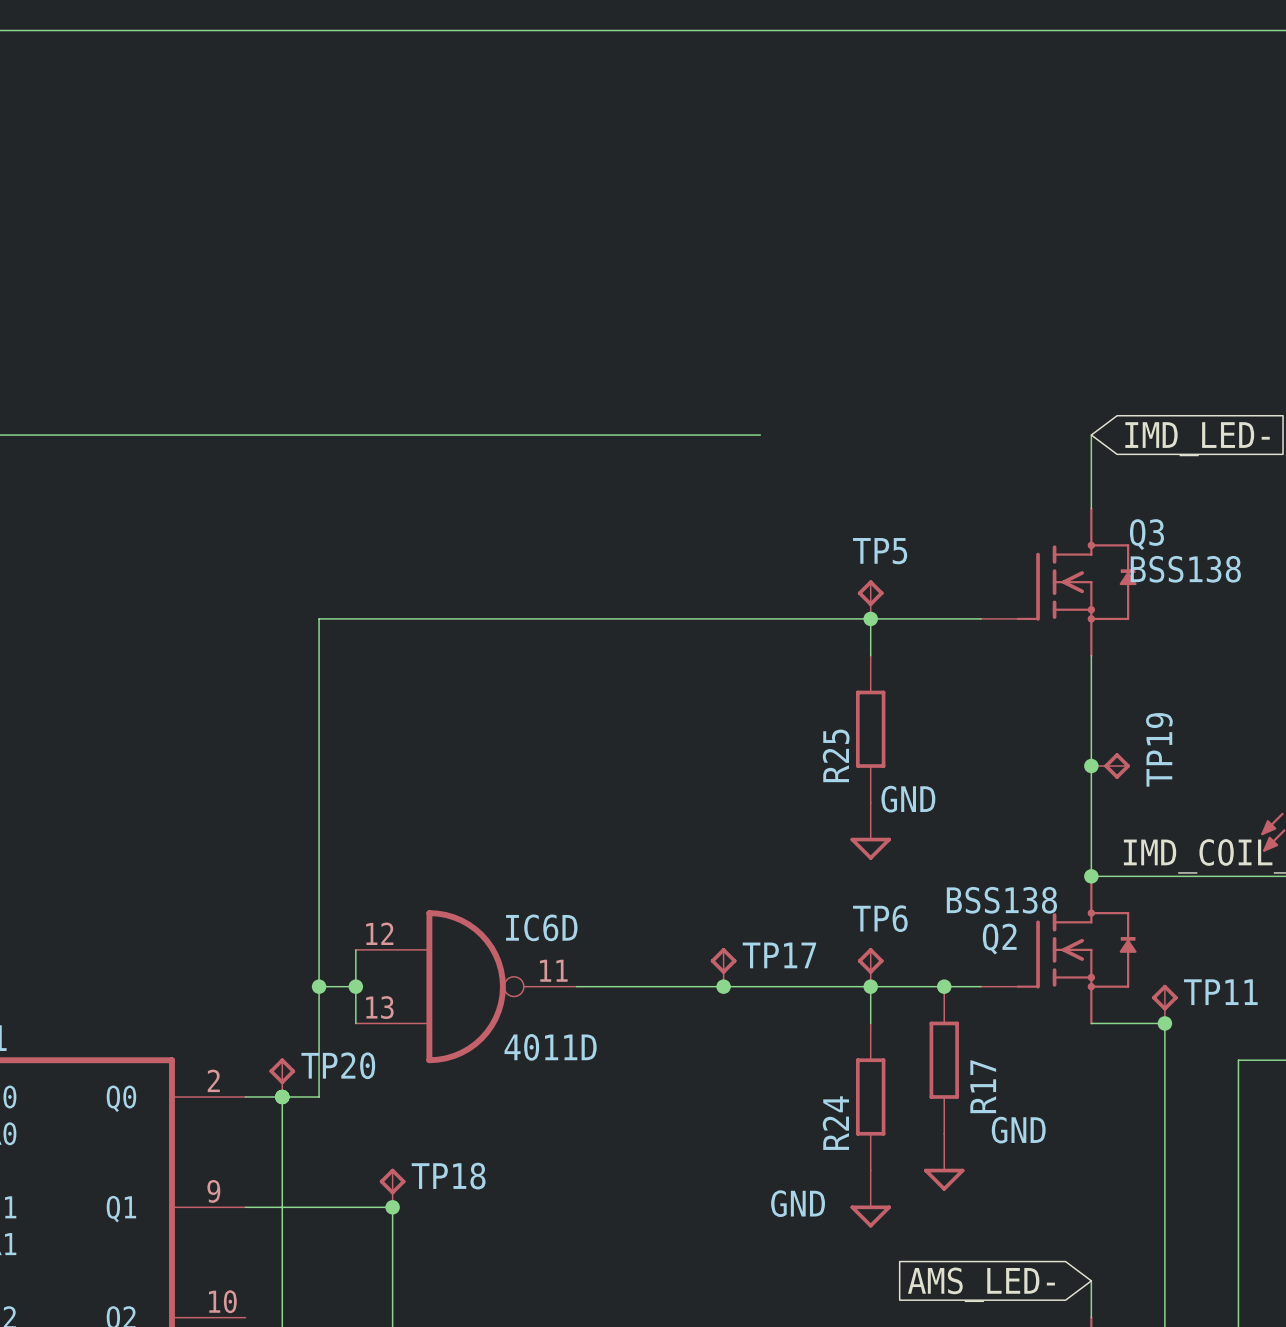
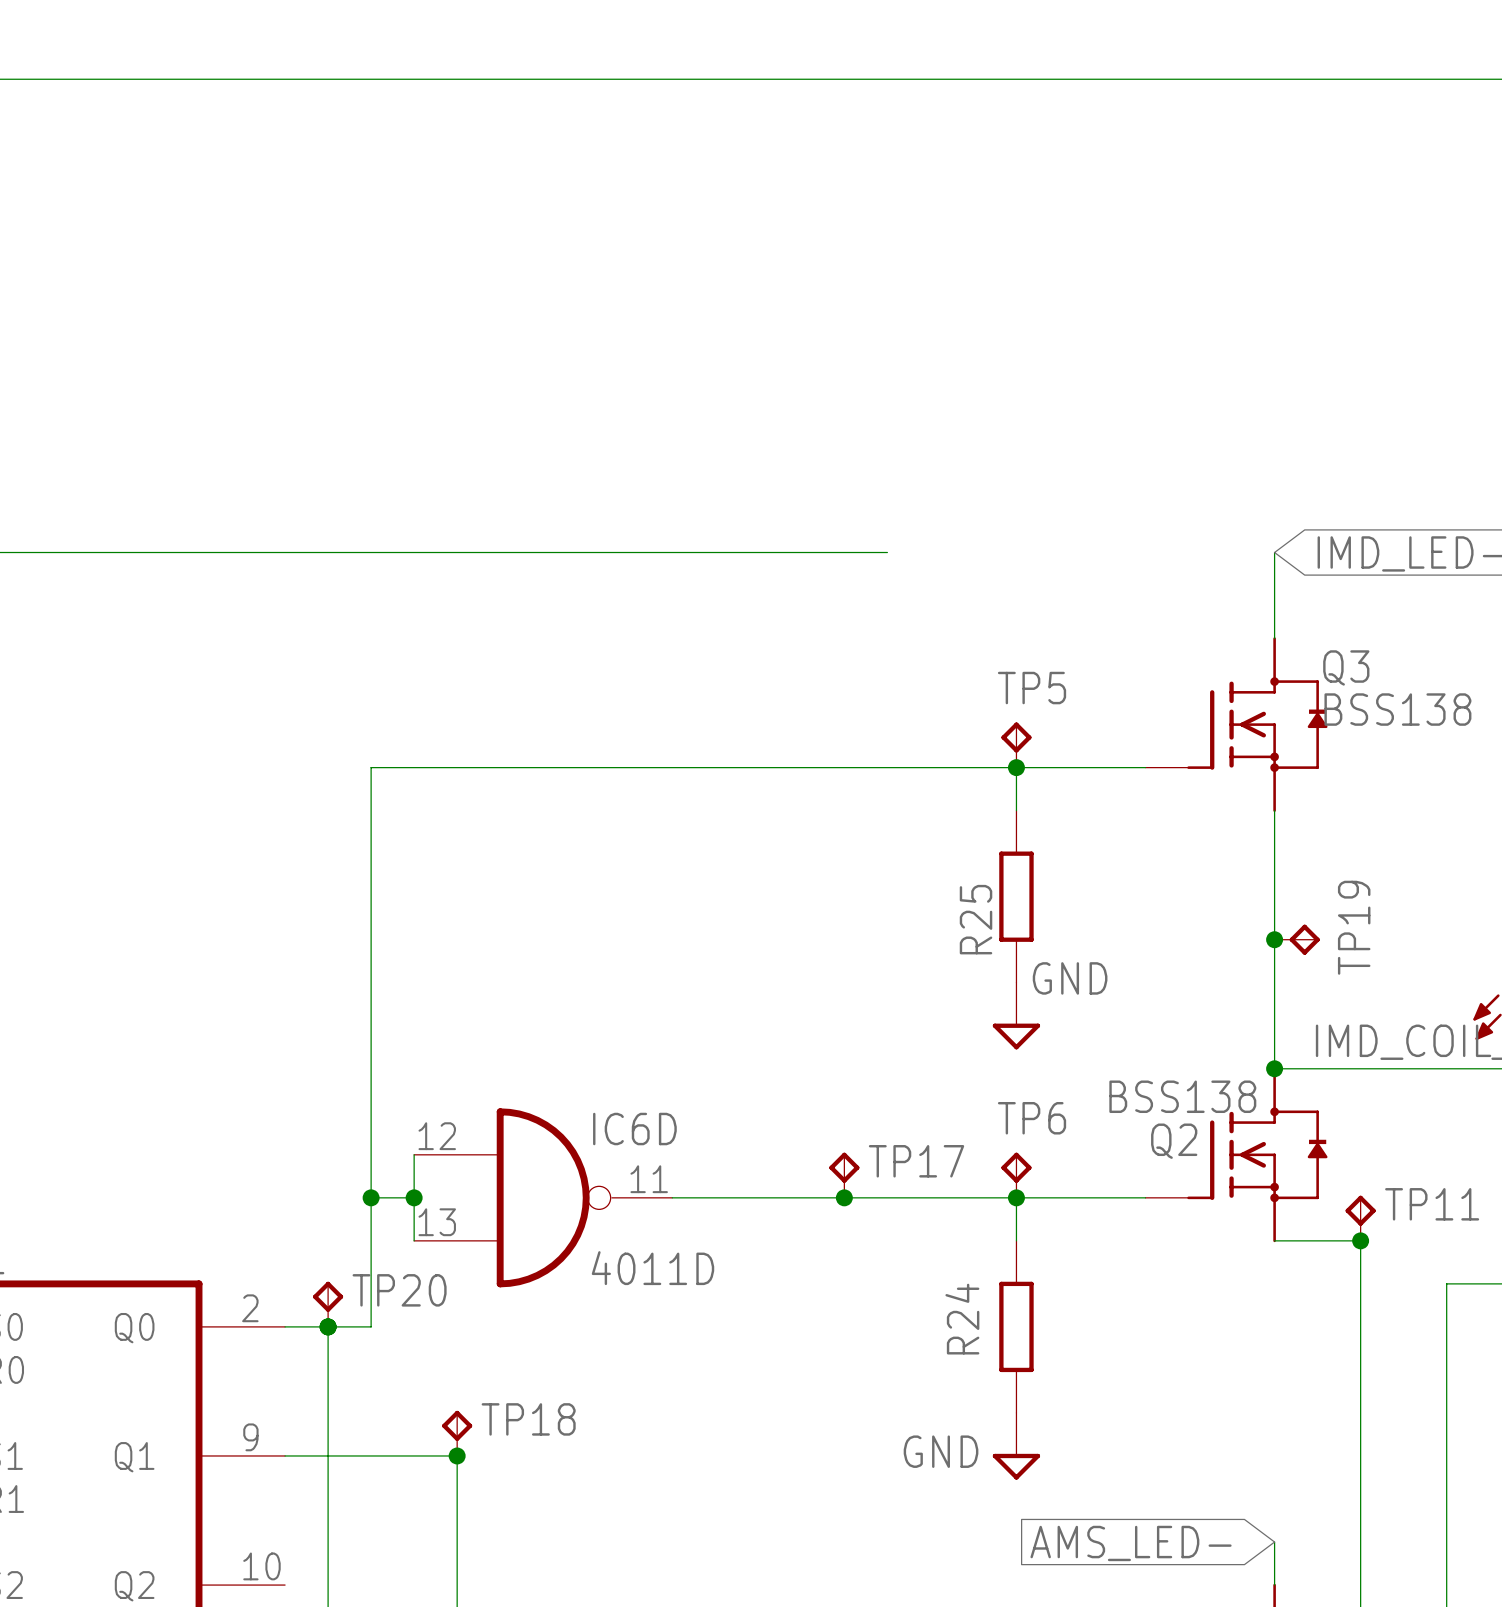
junction: (944, 986) -> none
R17: (944, 1060) -> none
R24 name position: R24 (835, 1123) -> R24 (962, 1319)
power symbol: GND (944, 1162) -> none

